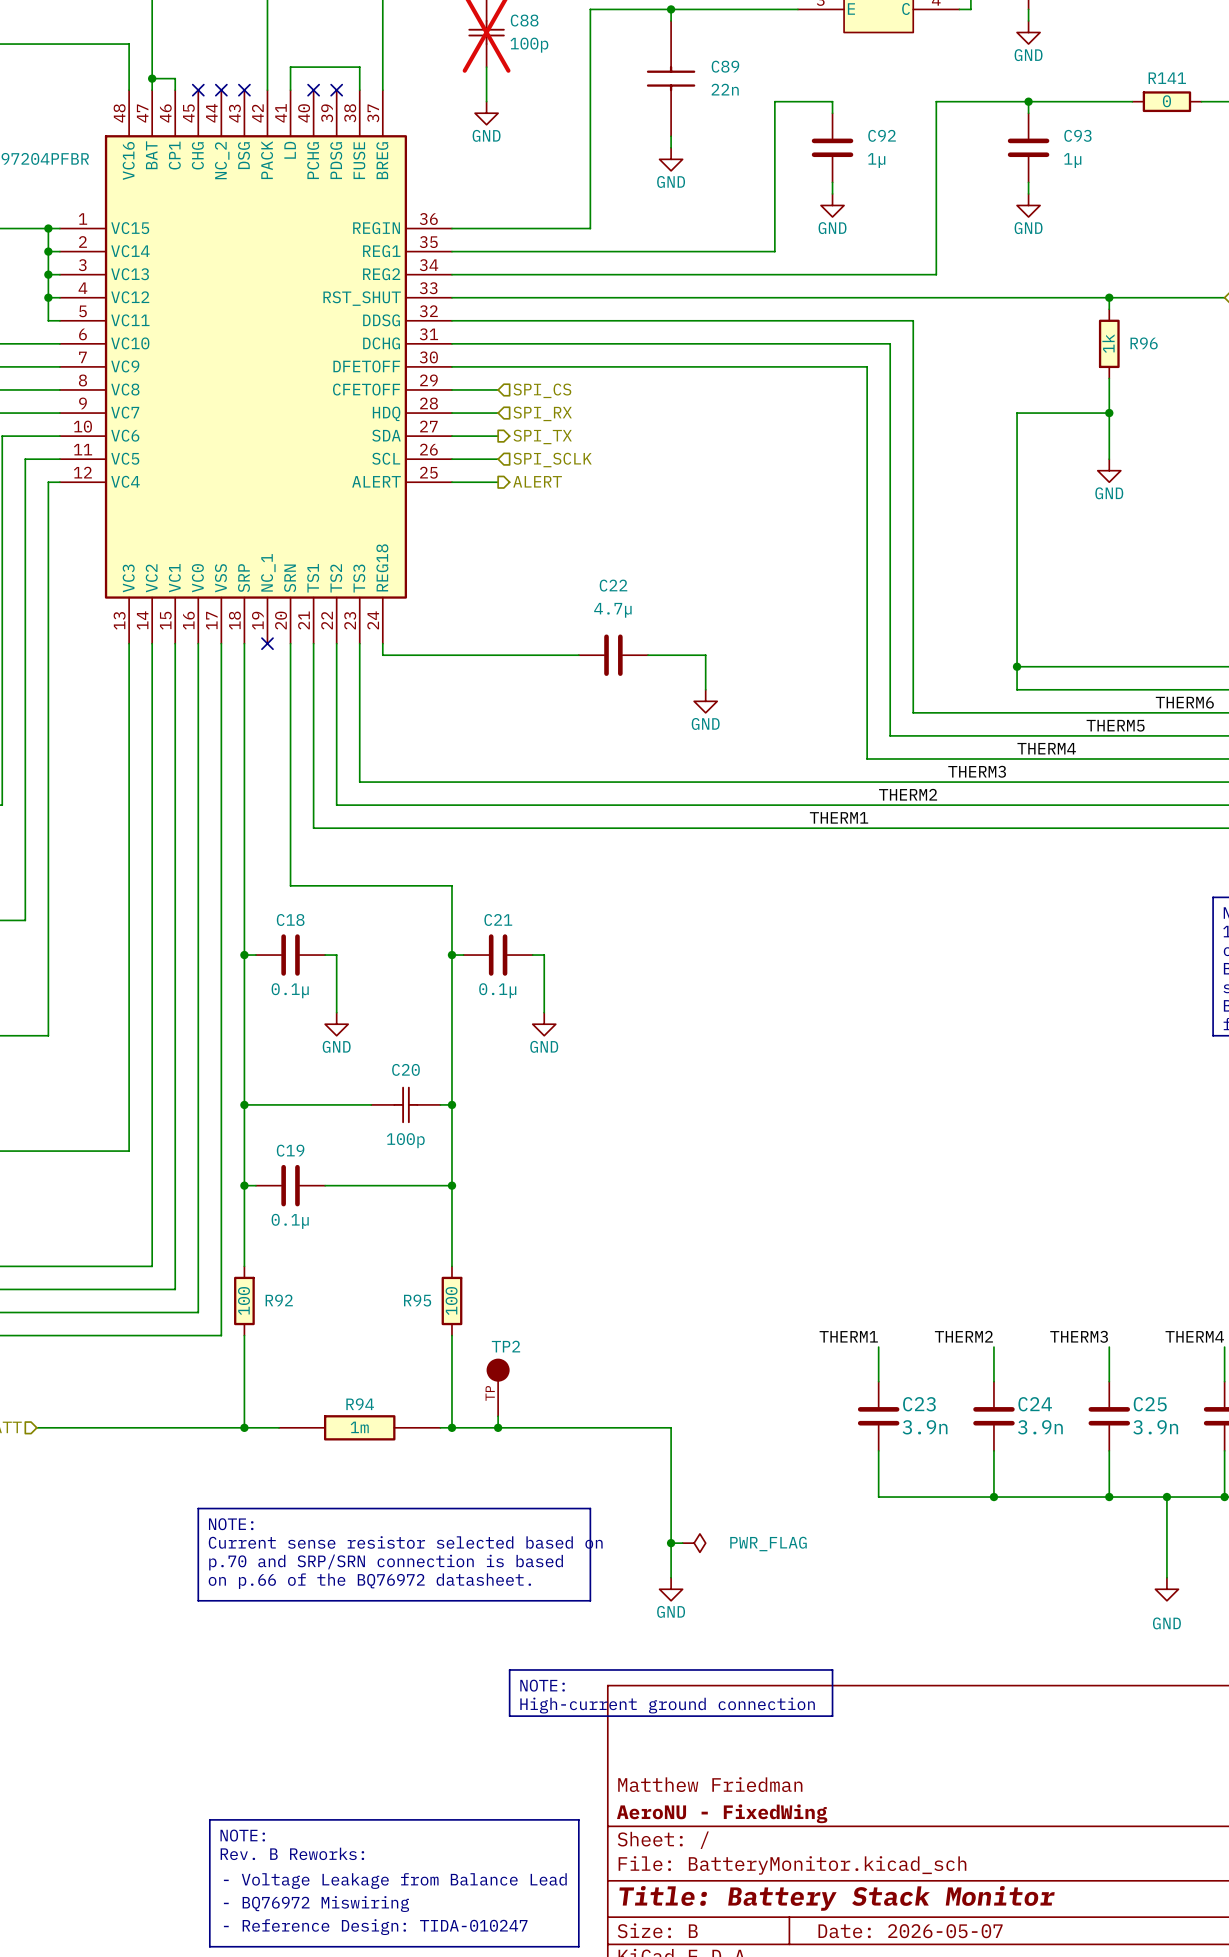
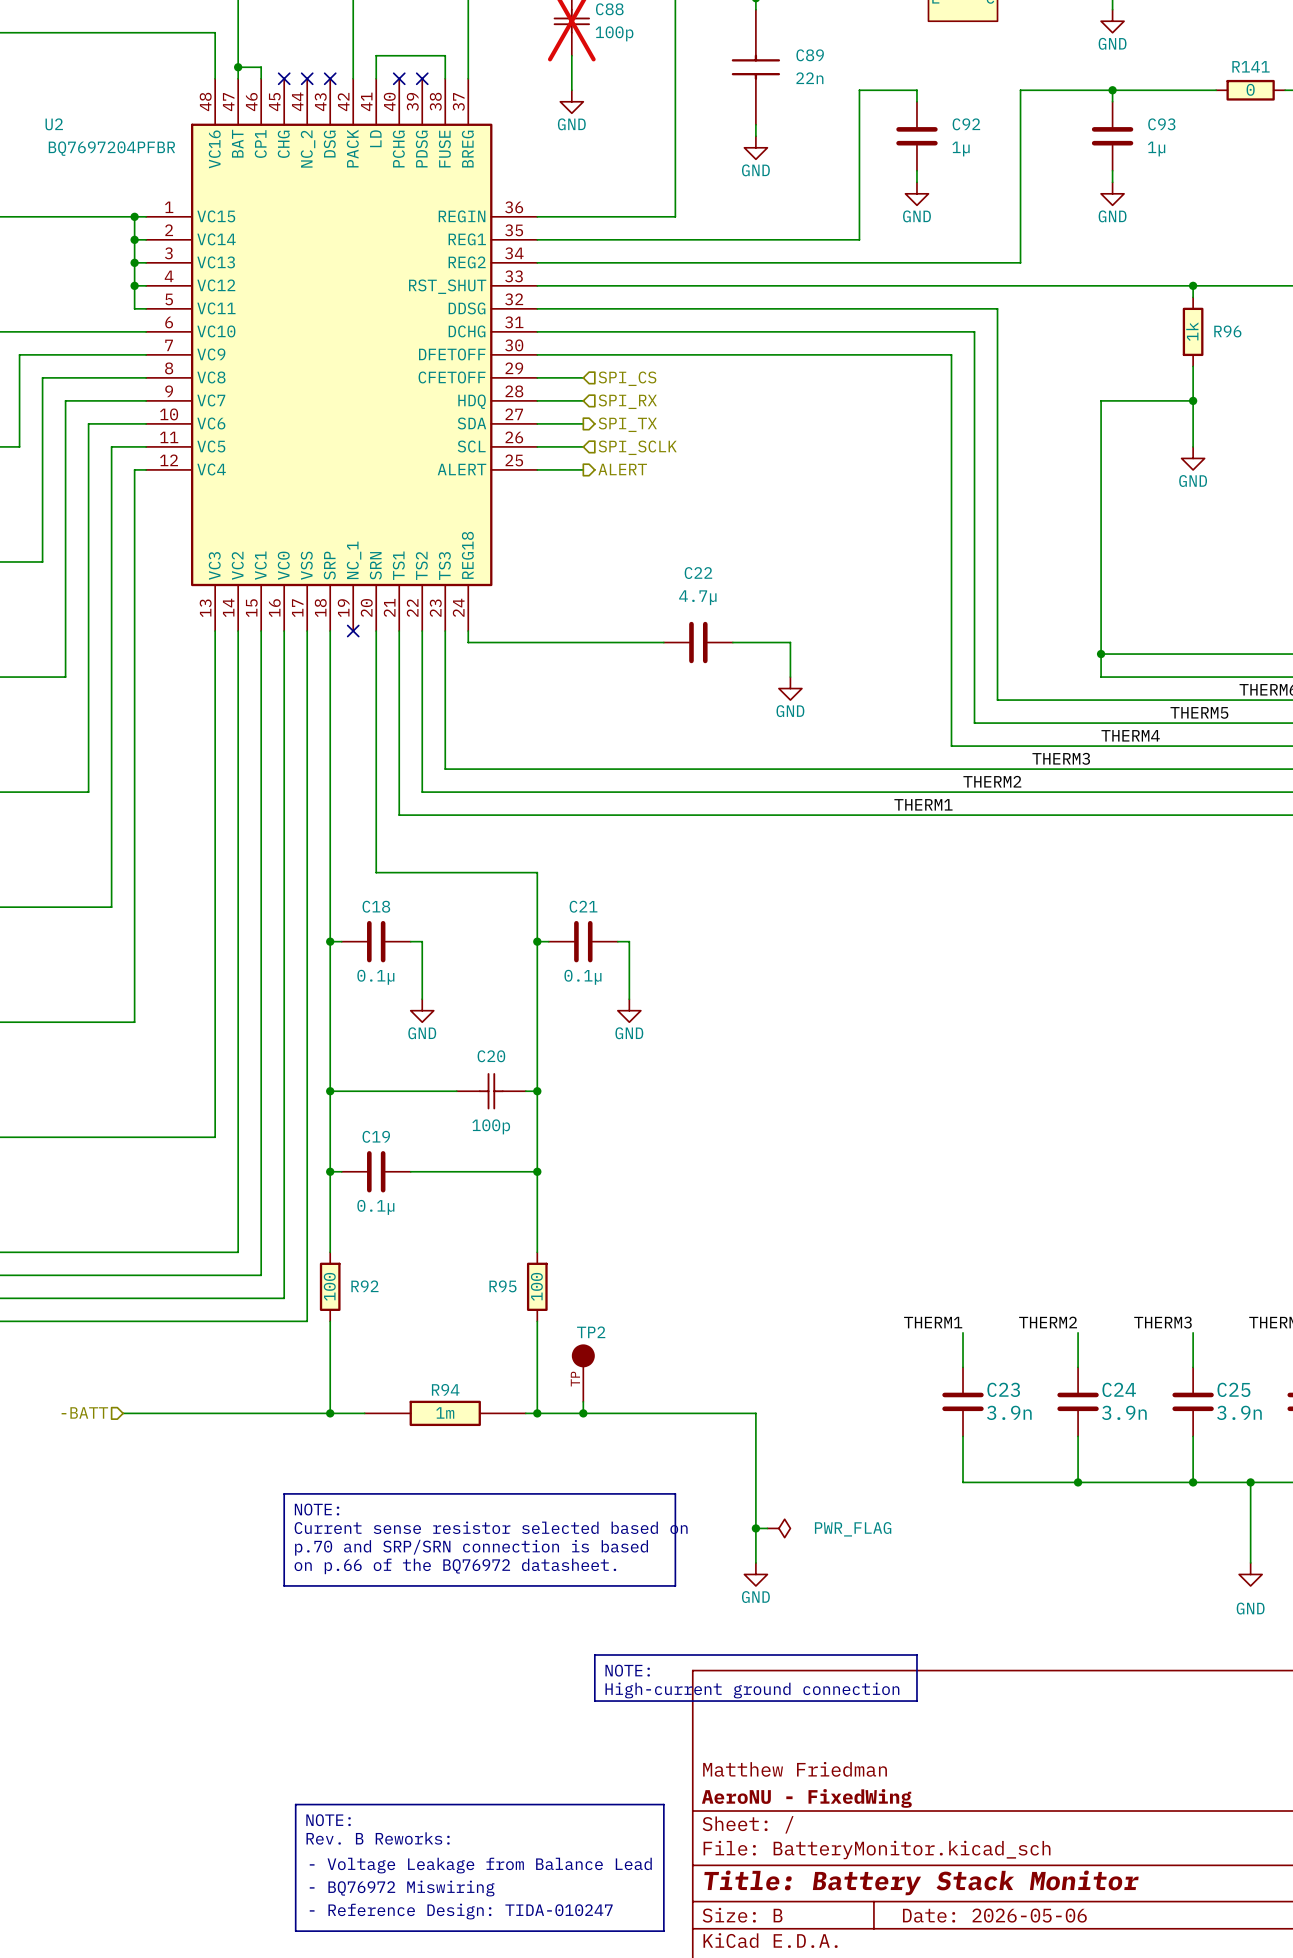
title block: Date: 2026-05-07 (910, 1931) -> Date: 2026-05-06 (994, 1915)

